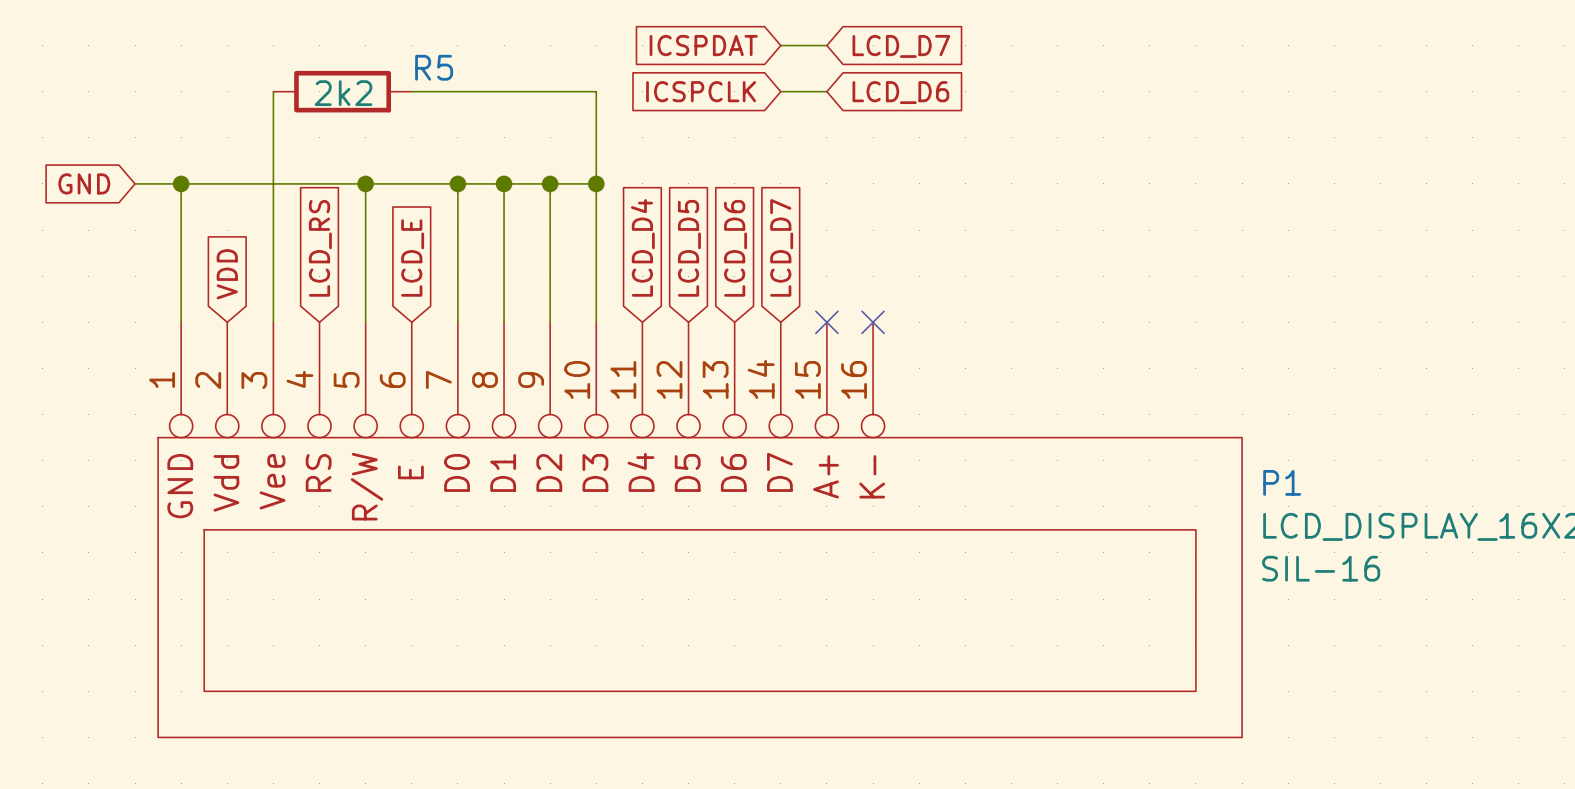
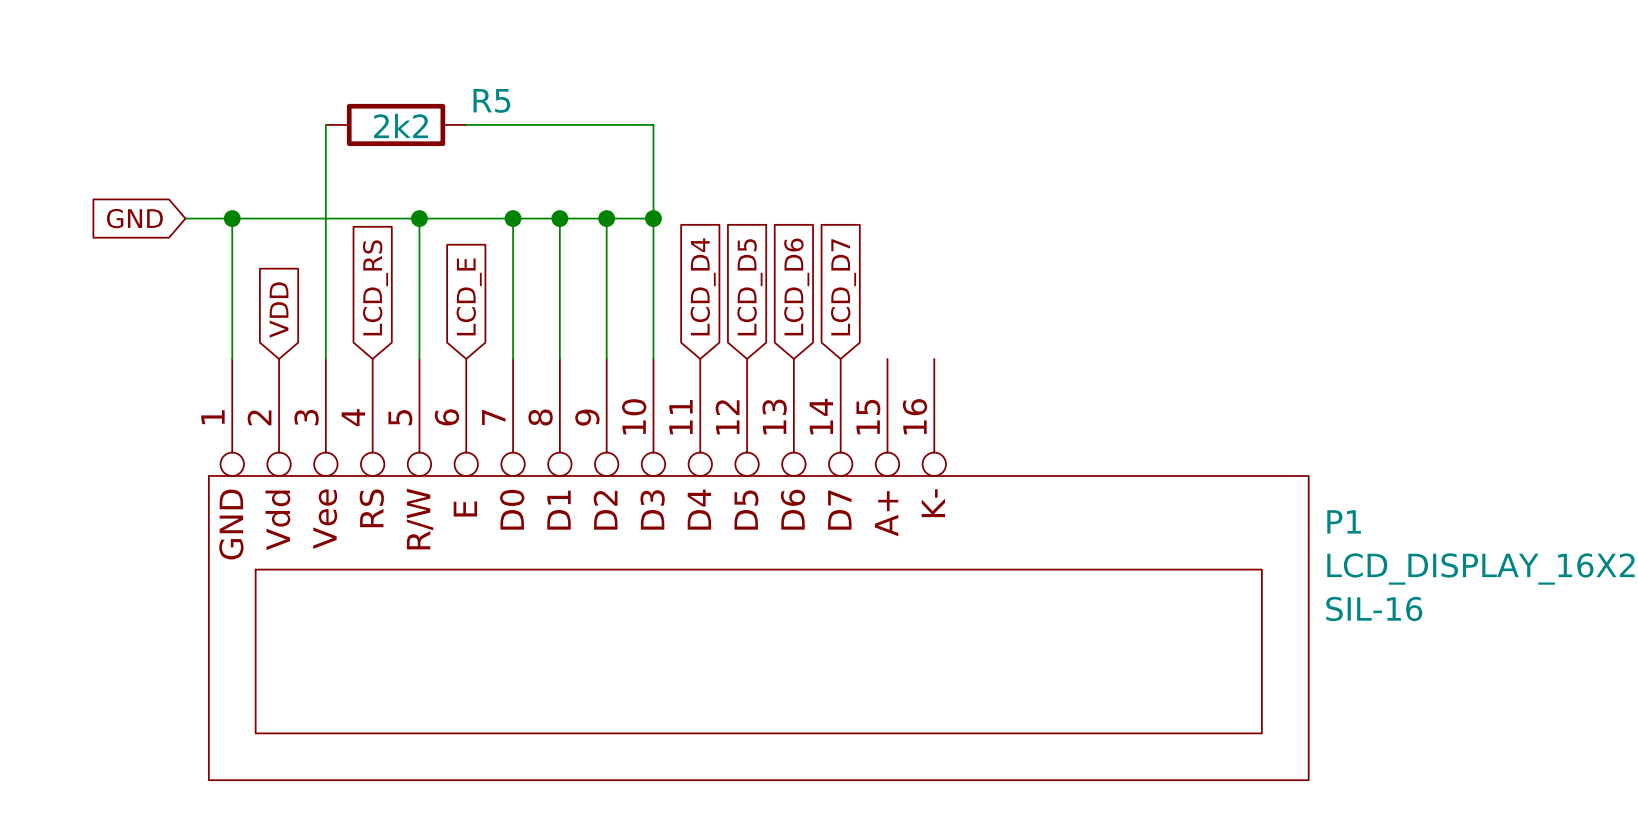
global label: ICSPDAT (703, 45) -> none
wire: (780, 45) (826, 45) -> none
global label: LCD_D7 (901, 46) -> none
global label: ICSPCLK (701, 91) -> none
wire: (780, 91) (826, 91) -> none
global label: LCD_D6 (900, 92) -> none
no-connect mark: (826, 322) -> none
no-connect mark: (873, 322) -> none

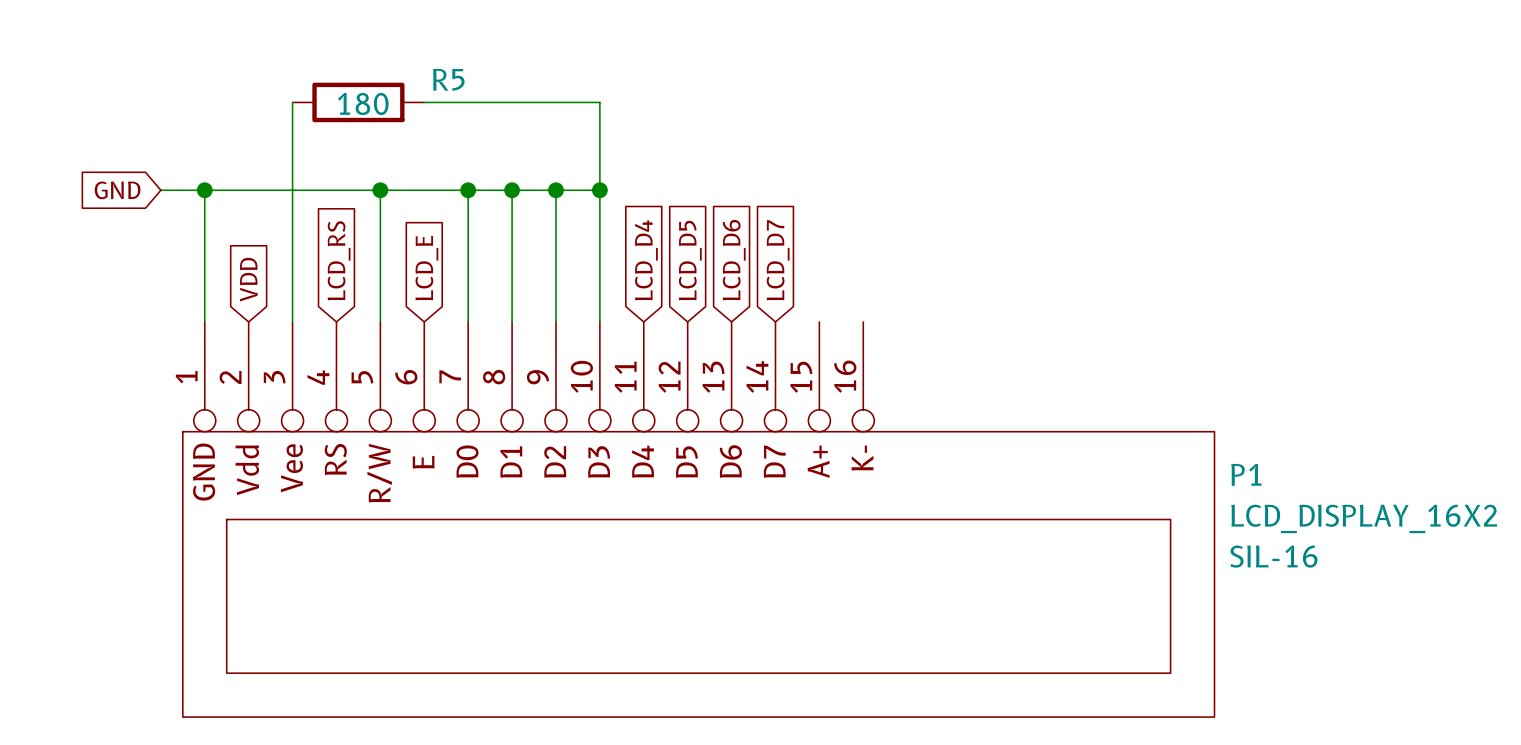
R5 value: 2k2 (401, 125) -> 180 (363, 103)

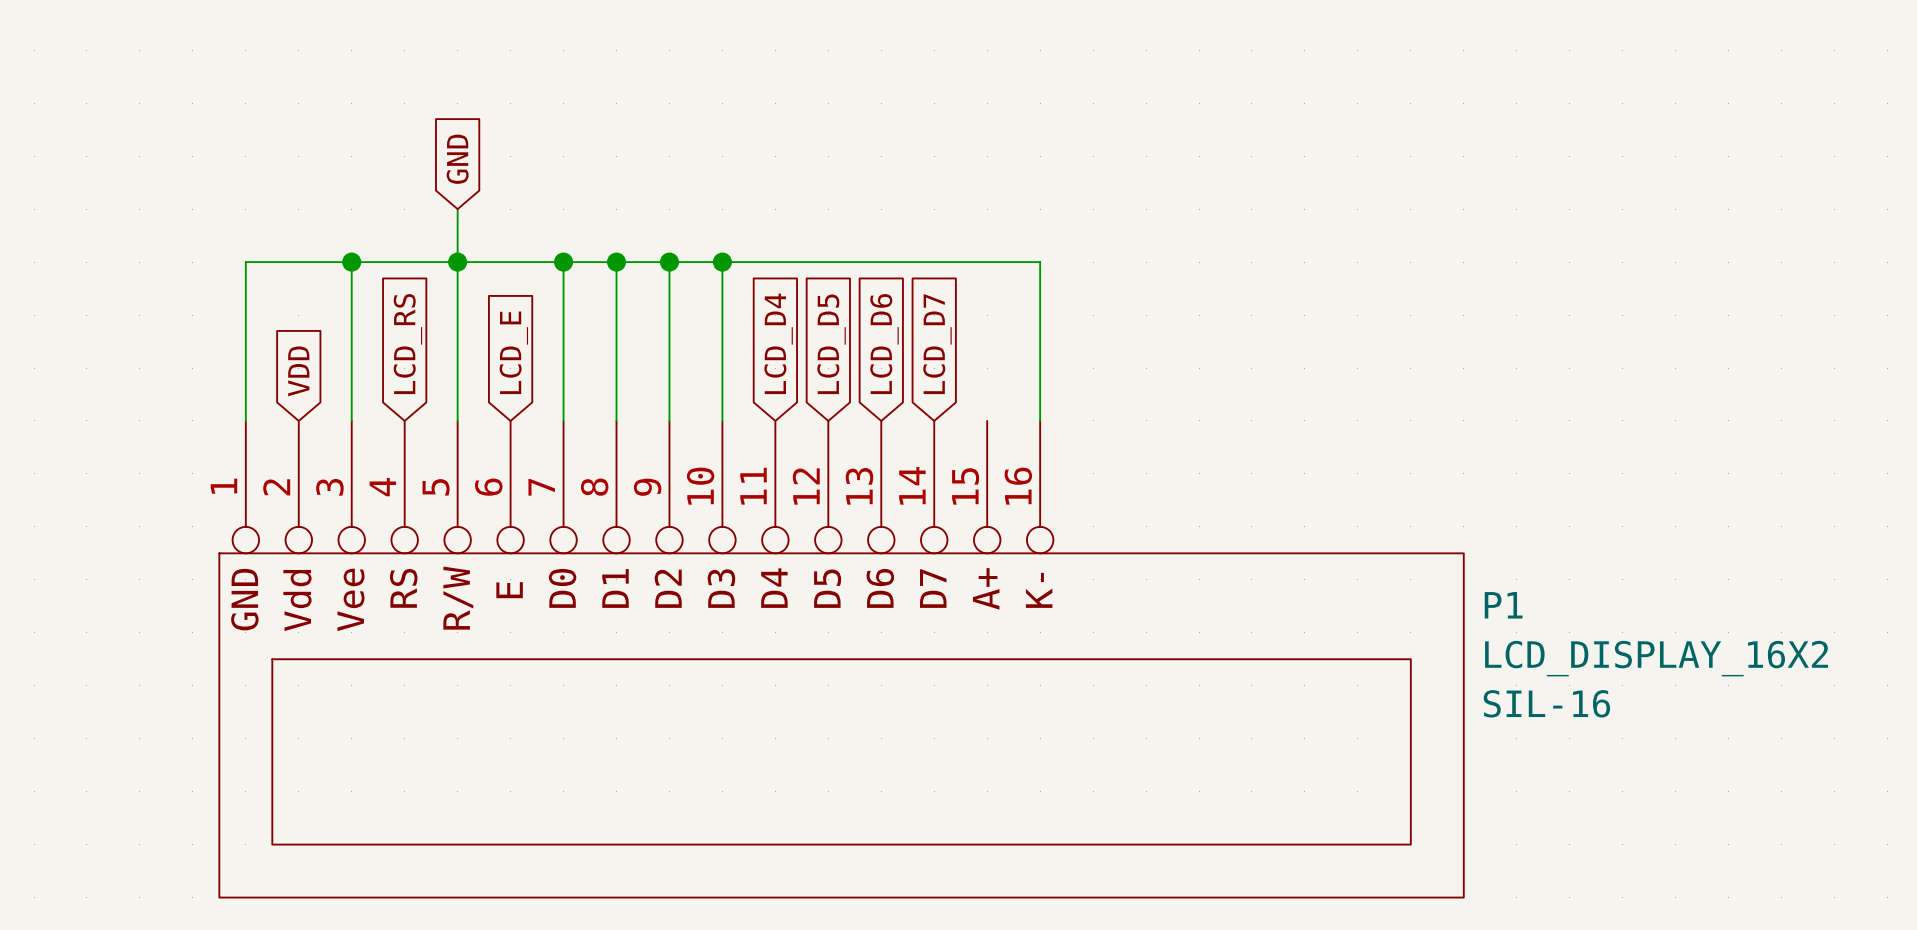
wire: (292, 102) (292, 190) -> none
R5: 180 (358, 102) -> none
wire: (424, 102) (599, 102) (599, 190) -> (1040, 420) (1040, 262) (722, 262)
wire: none -> (457, 209) (457, 262)
global label rotation: 0° (117, 190) -> 90° clockwise (457, 159)
global label position: GND (117, 190) -> GND (457, 159)
wire: (160, 190) (204, 190) -> none
junction position: (204, 190) -> (351, 262)

